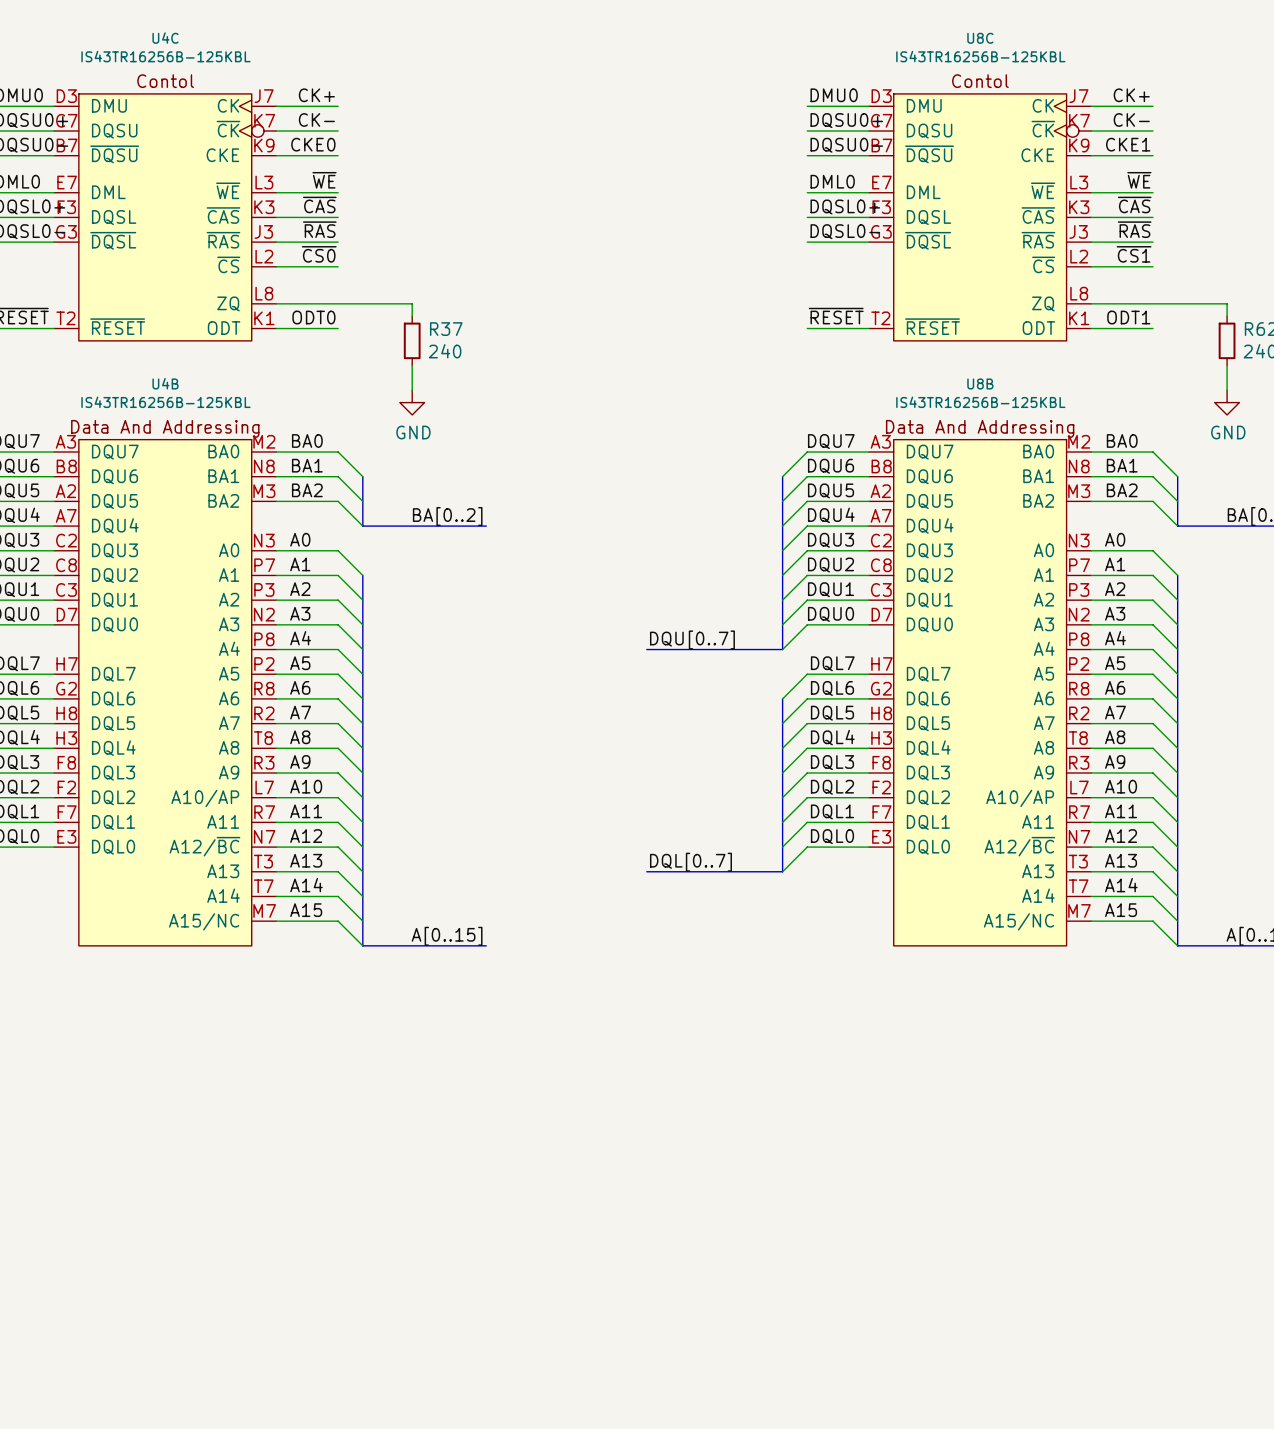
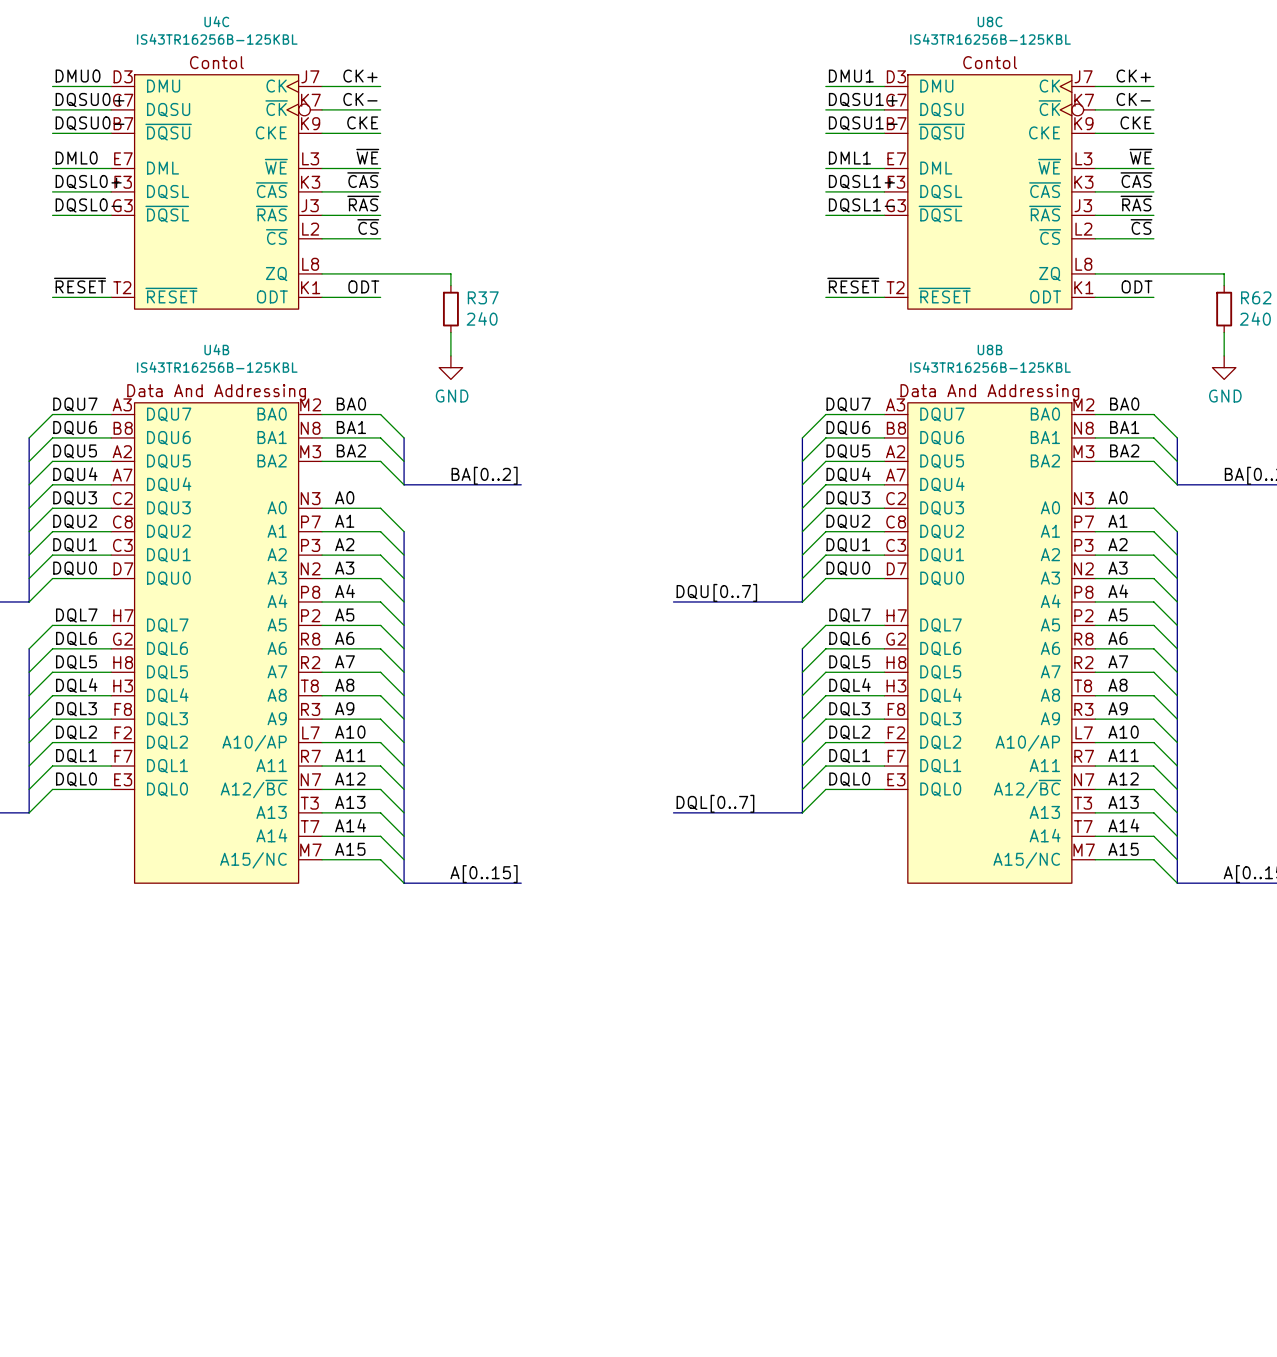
label: DMU0 (834, 95) -> DMU1 (851, 76)
label: DQSU0+ (846, 120) -> DQSU1+ (863, 100)
label: CKE0 (313, 144) -> CKE (362, 122)
label: CKE1 (1128, 144) -> CKE (1135, 122)
label: DQSU0- (846, 145) -> DQSU1- (863, 123)
label: DML0 (832, 181) -> DML1 (849, 158)
label: DQSL0+ (845, 206) -> DQSL1+ (861, 182)
label: DQSL0- (845, 231) -> DQSL1- (861, 205)
label: ~{CS0} (319, 254) -> ~{CS} (368, 226)
label: ~{CS1} (1134, 254) -> ~{CS} (1141, 226)
label: ODT0 (313, 317) -> ODT (363, 286)
label: ODT1 (1128, 317) -> ODT (1137, 286)

